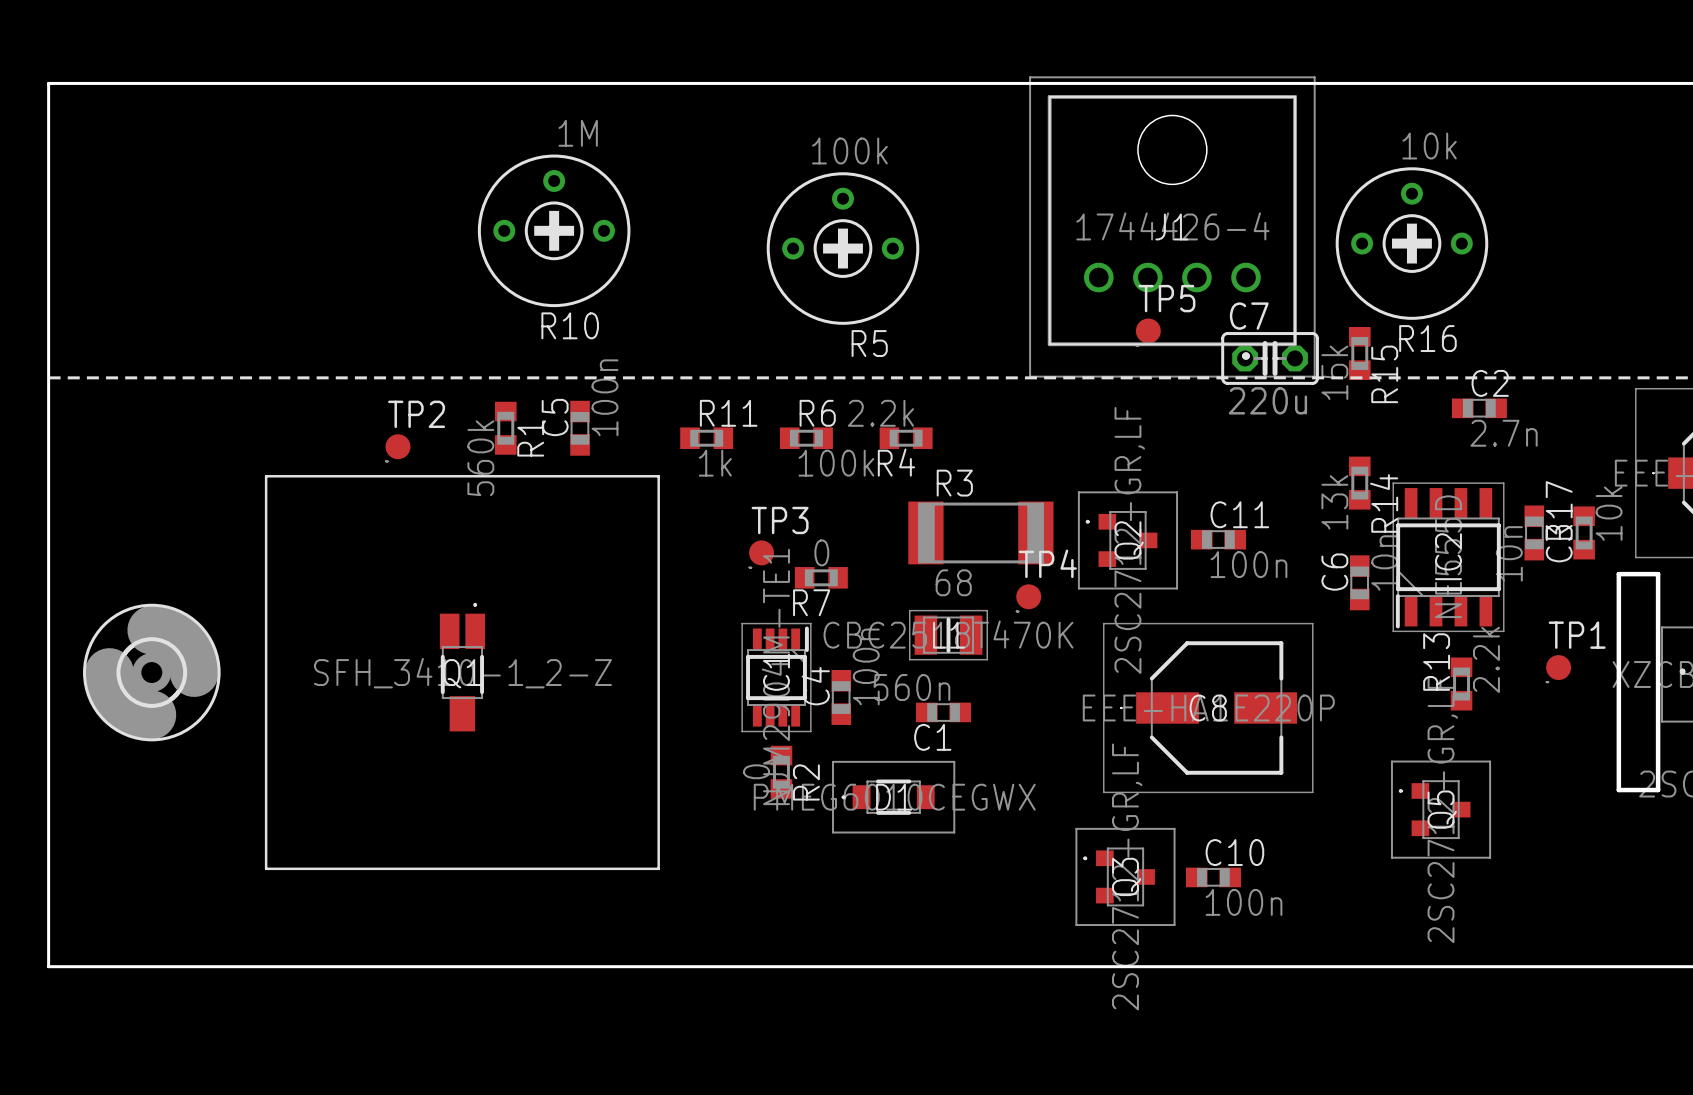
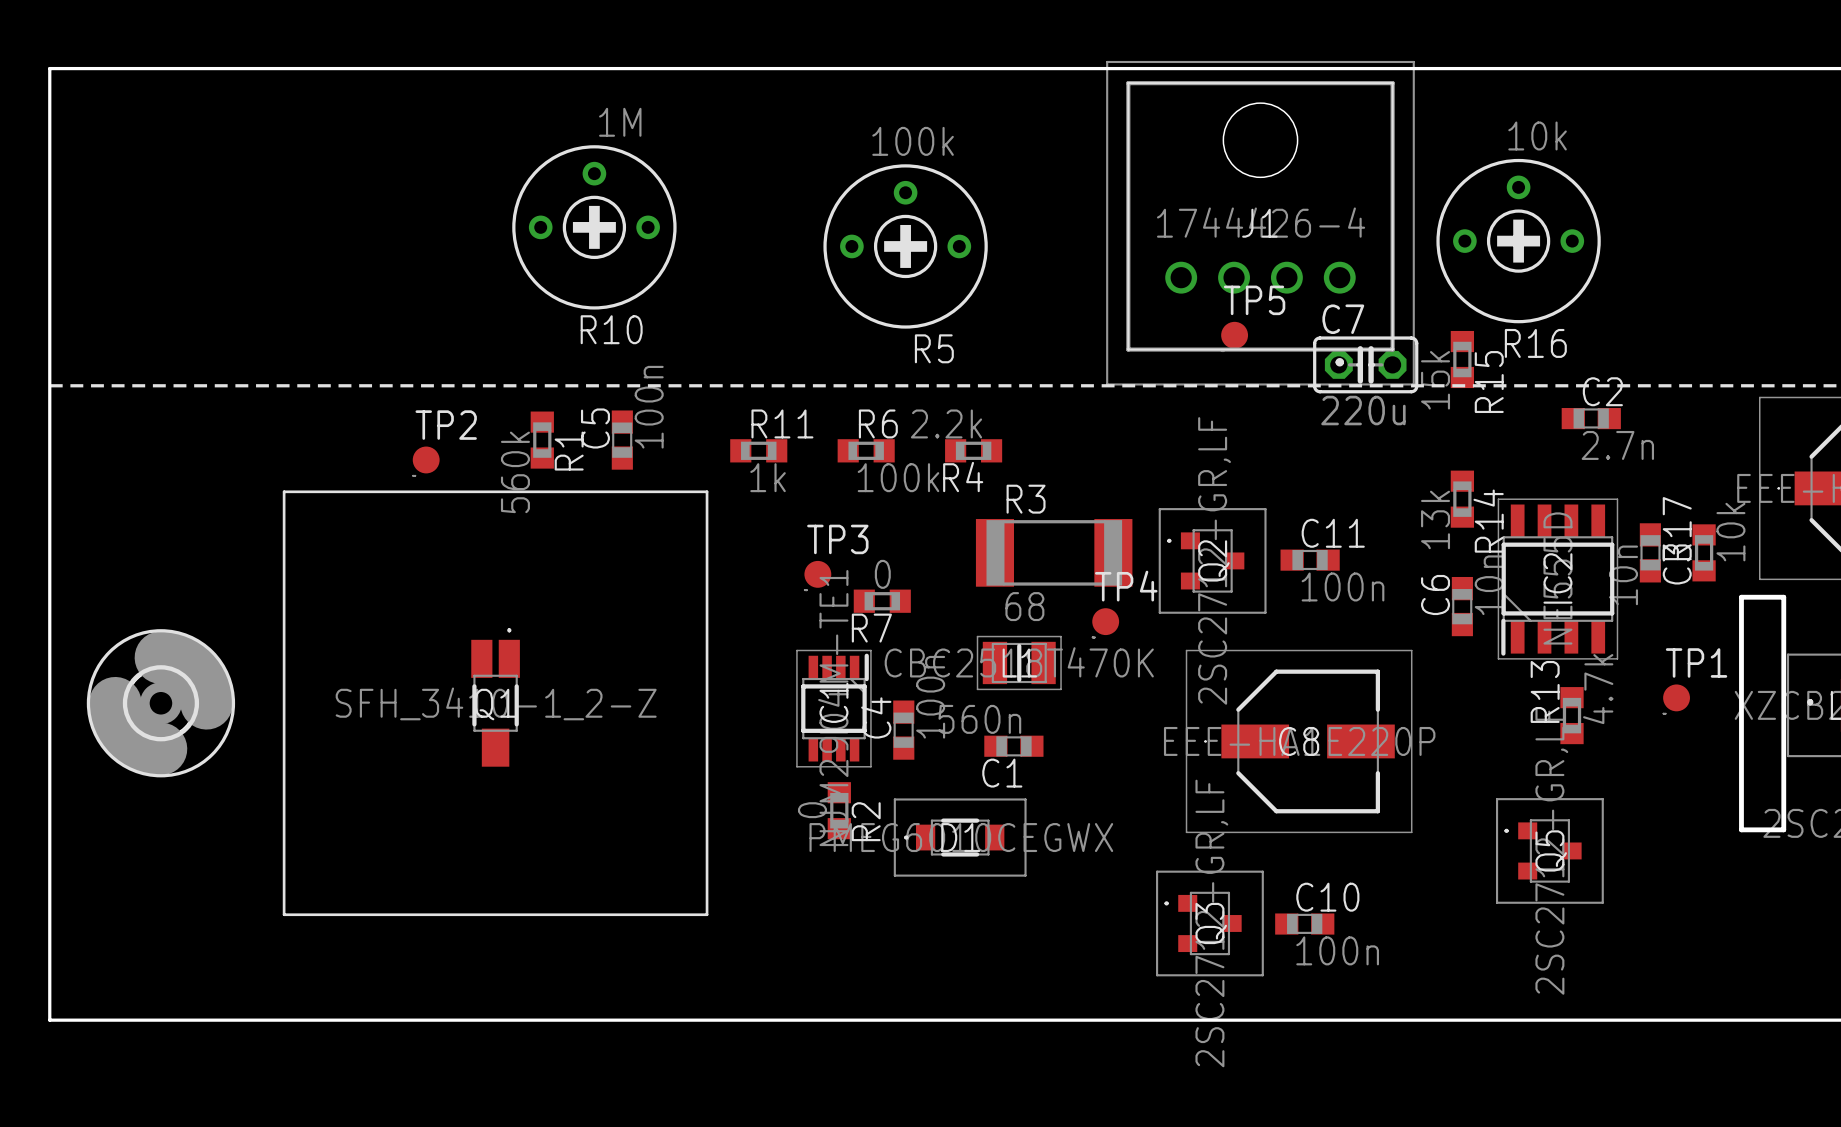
R13 value: 2.2k (1486, 659) -> 4.7k (1598, 689)

